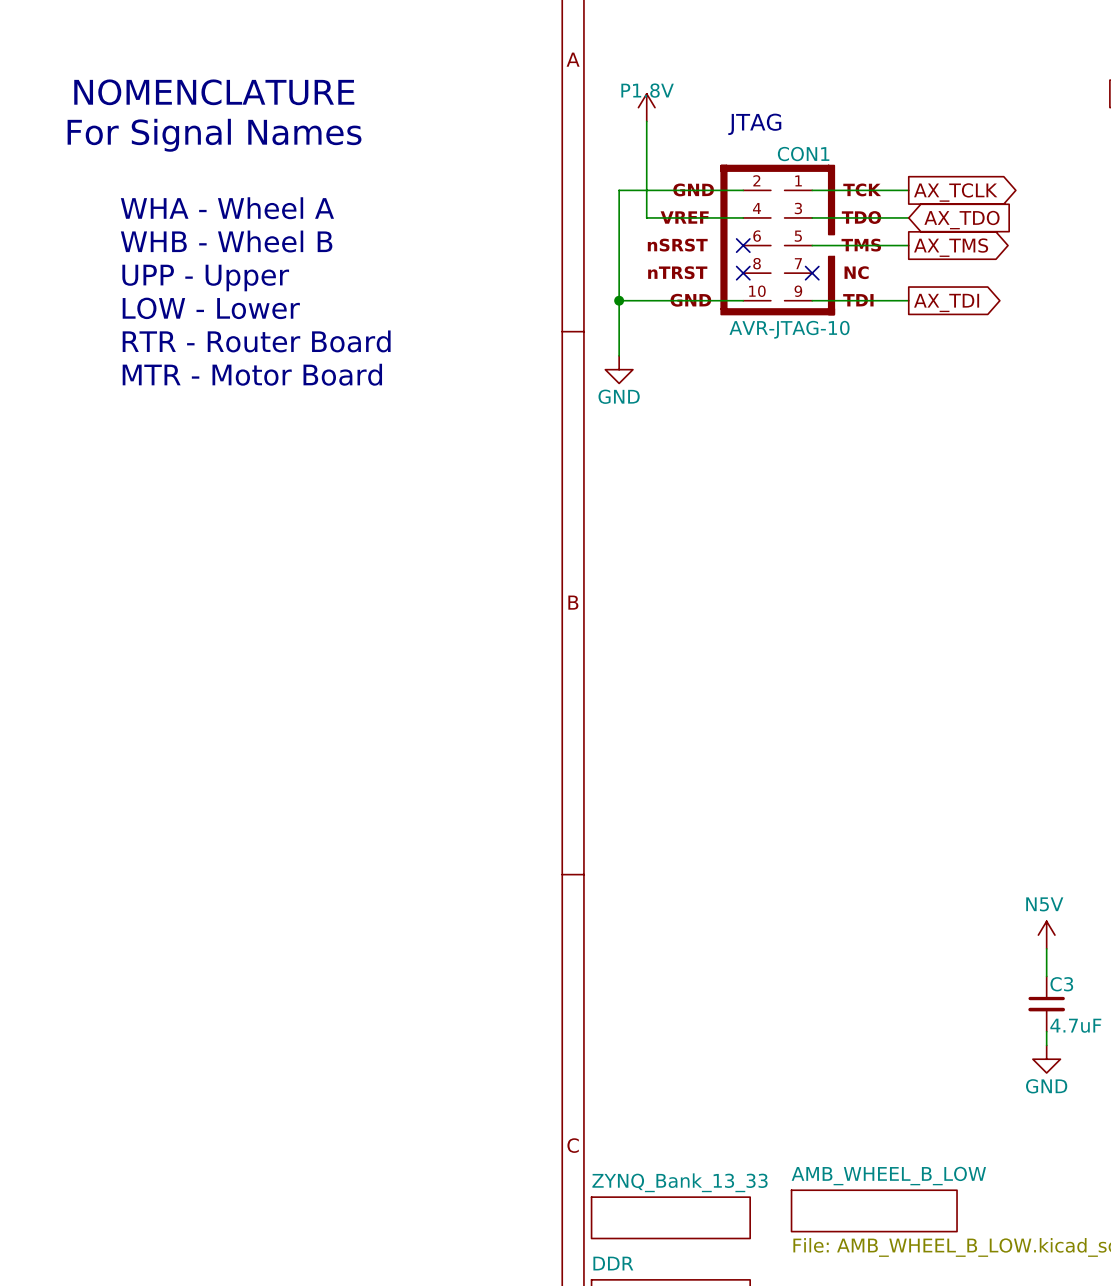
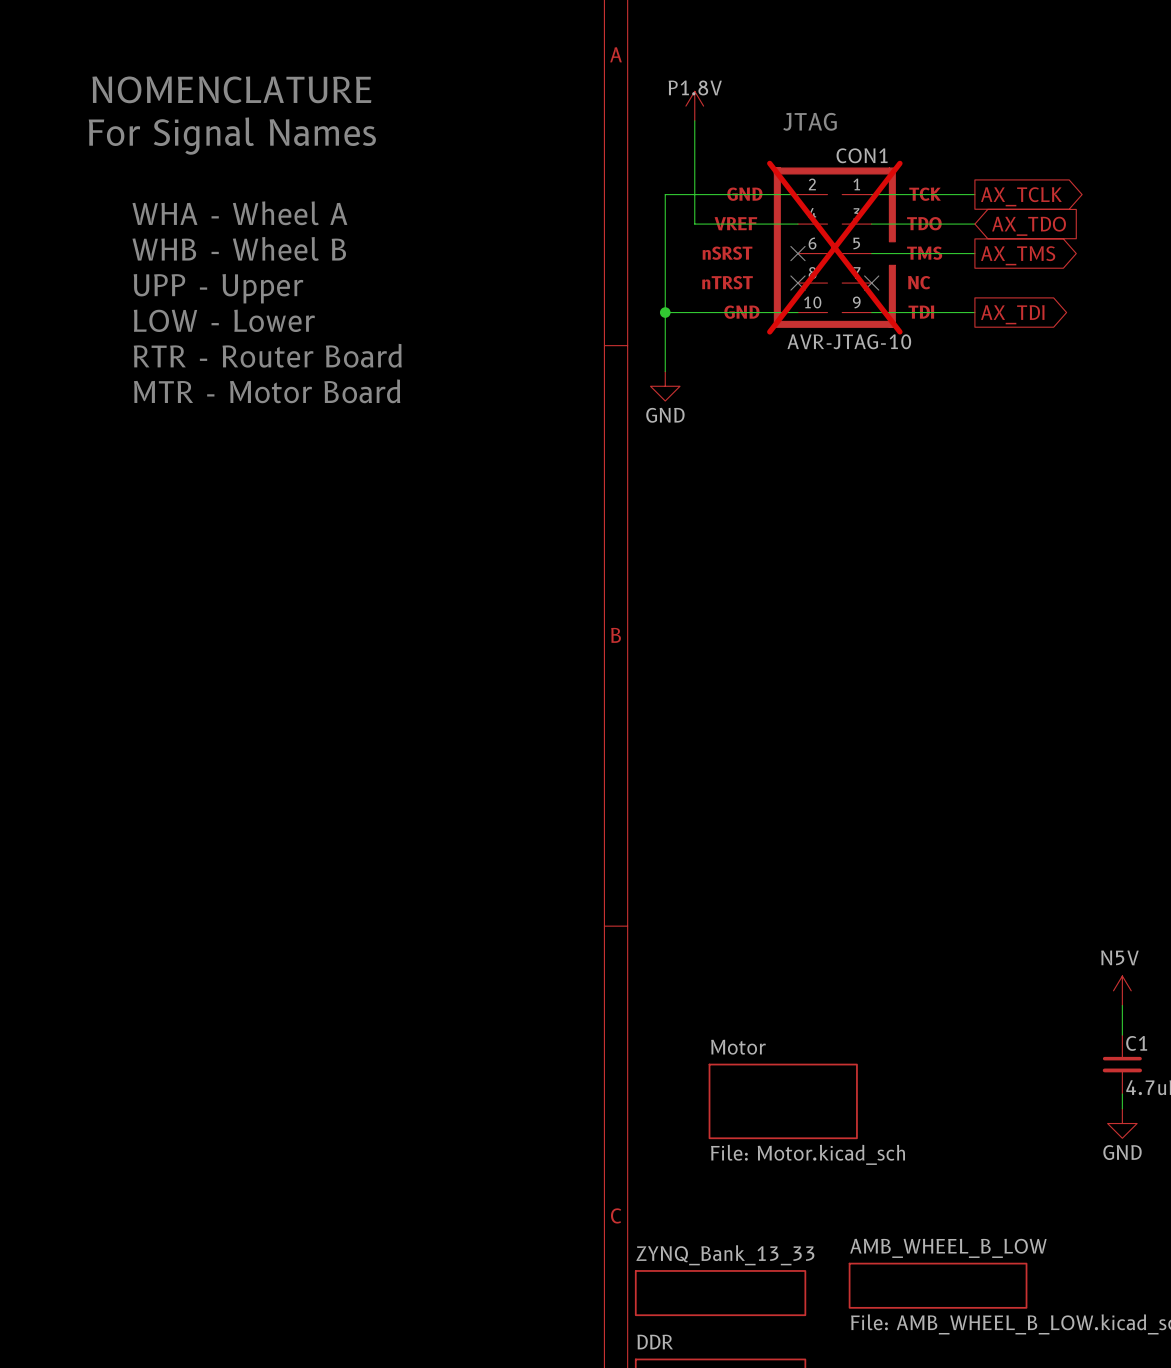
CON1 do-not-place cross: none -> (834, 247)
C3 name: C3 (1061, 984) -> C1 (1136, 1043)
sheet Motor: none -> File: Motor.kicad_sch (783, 1101)

